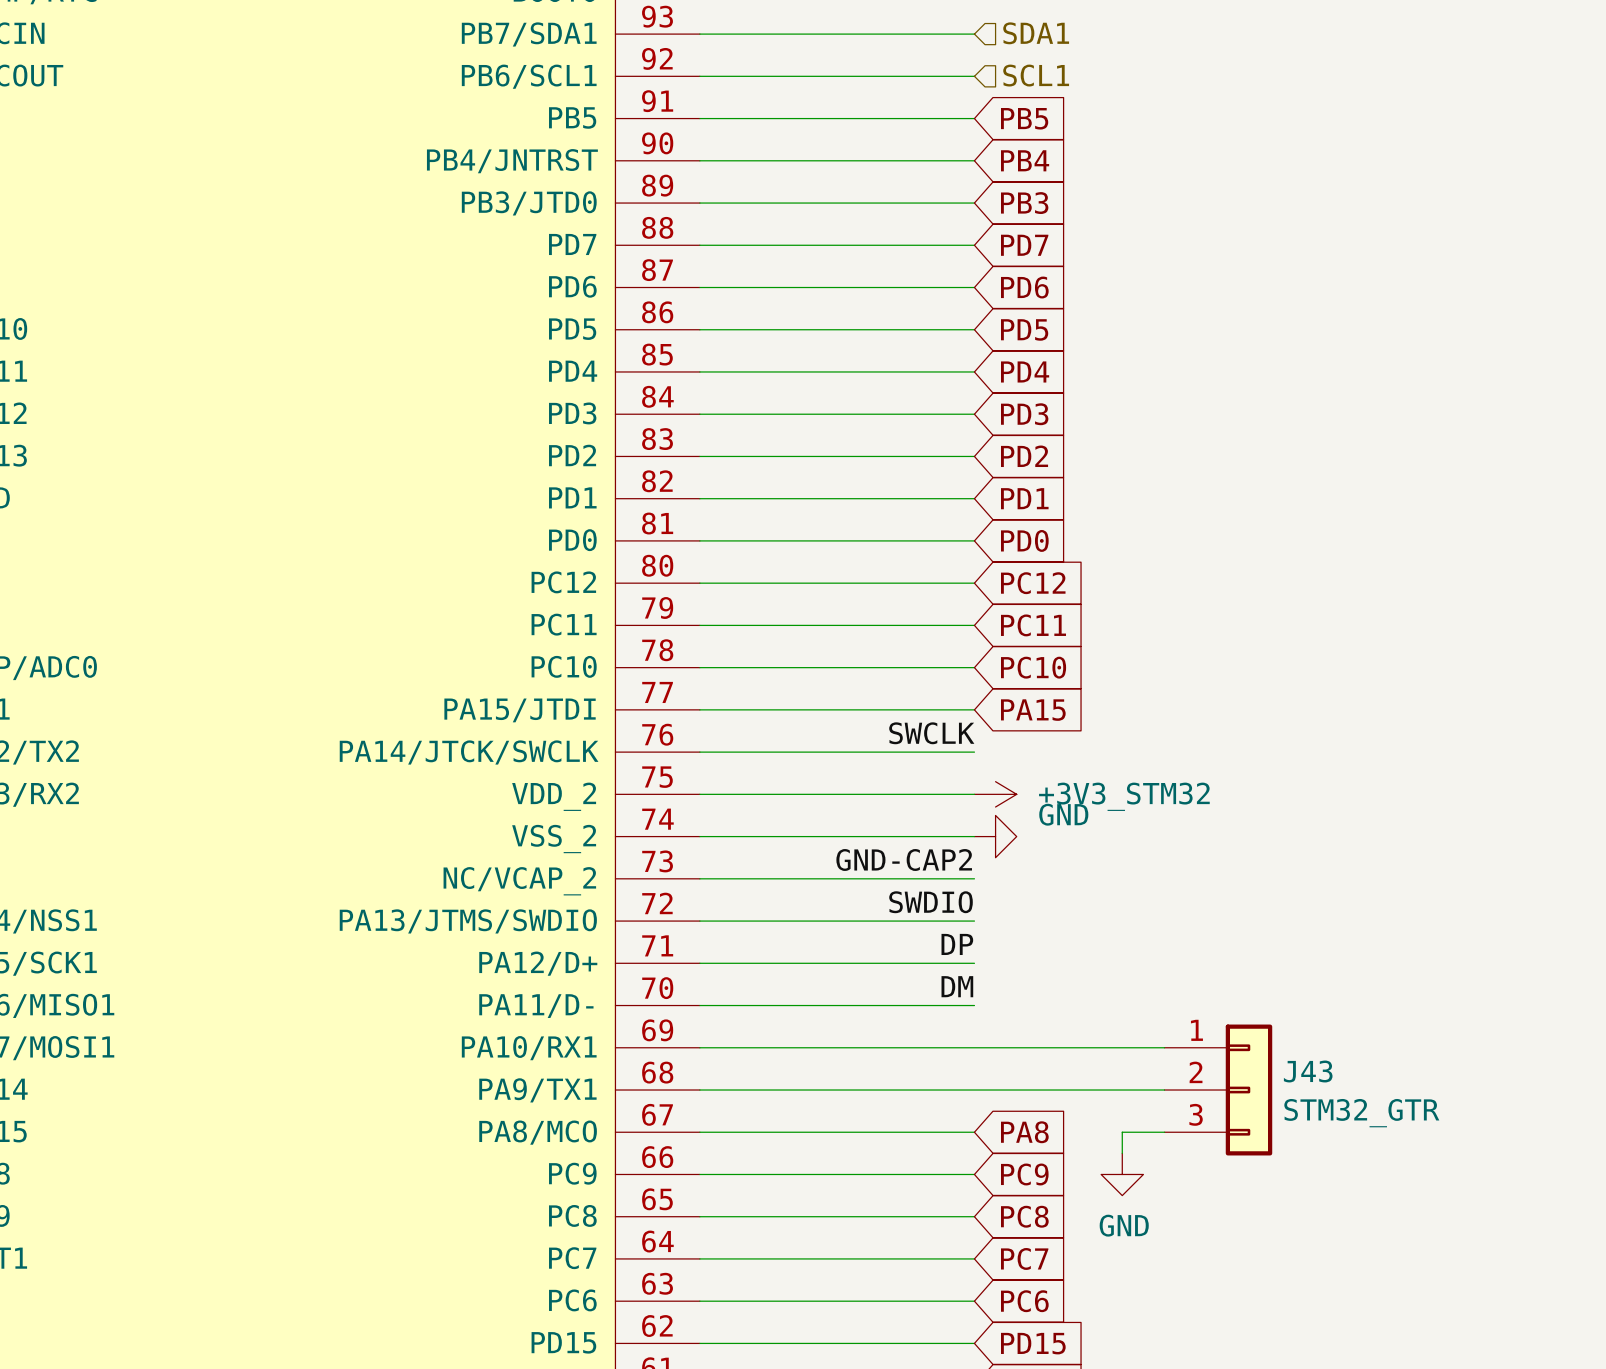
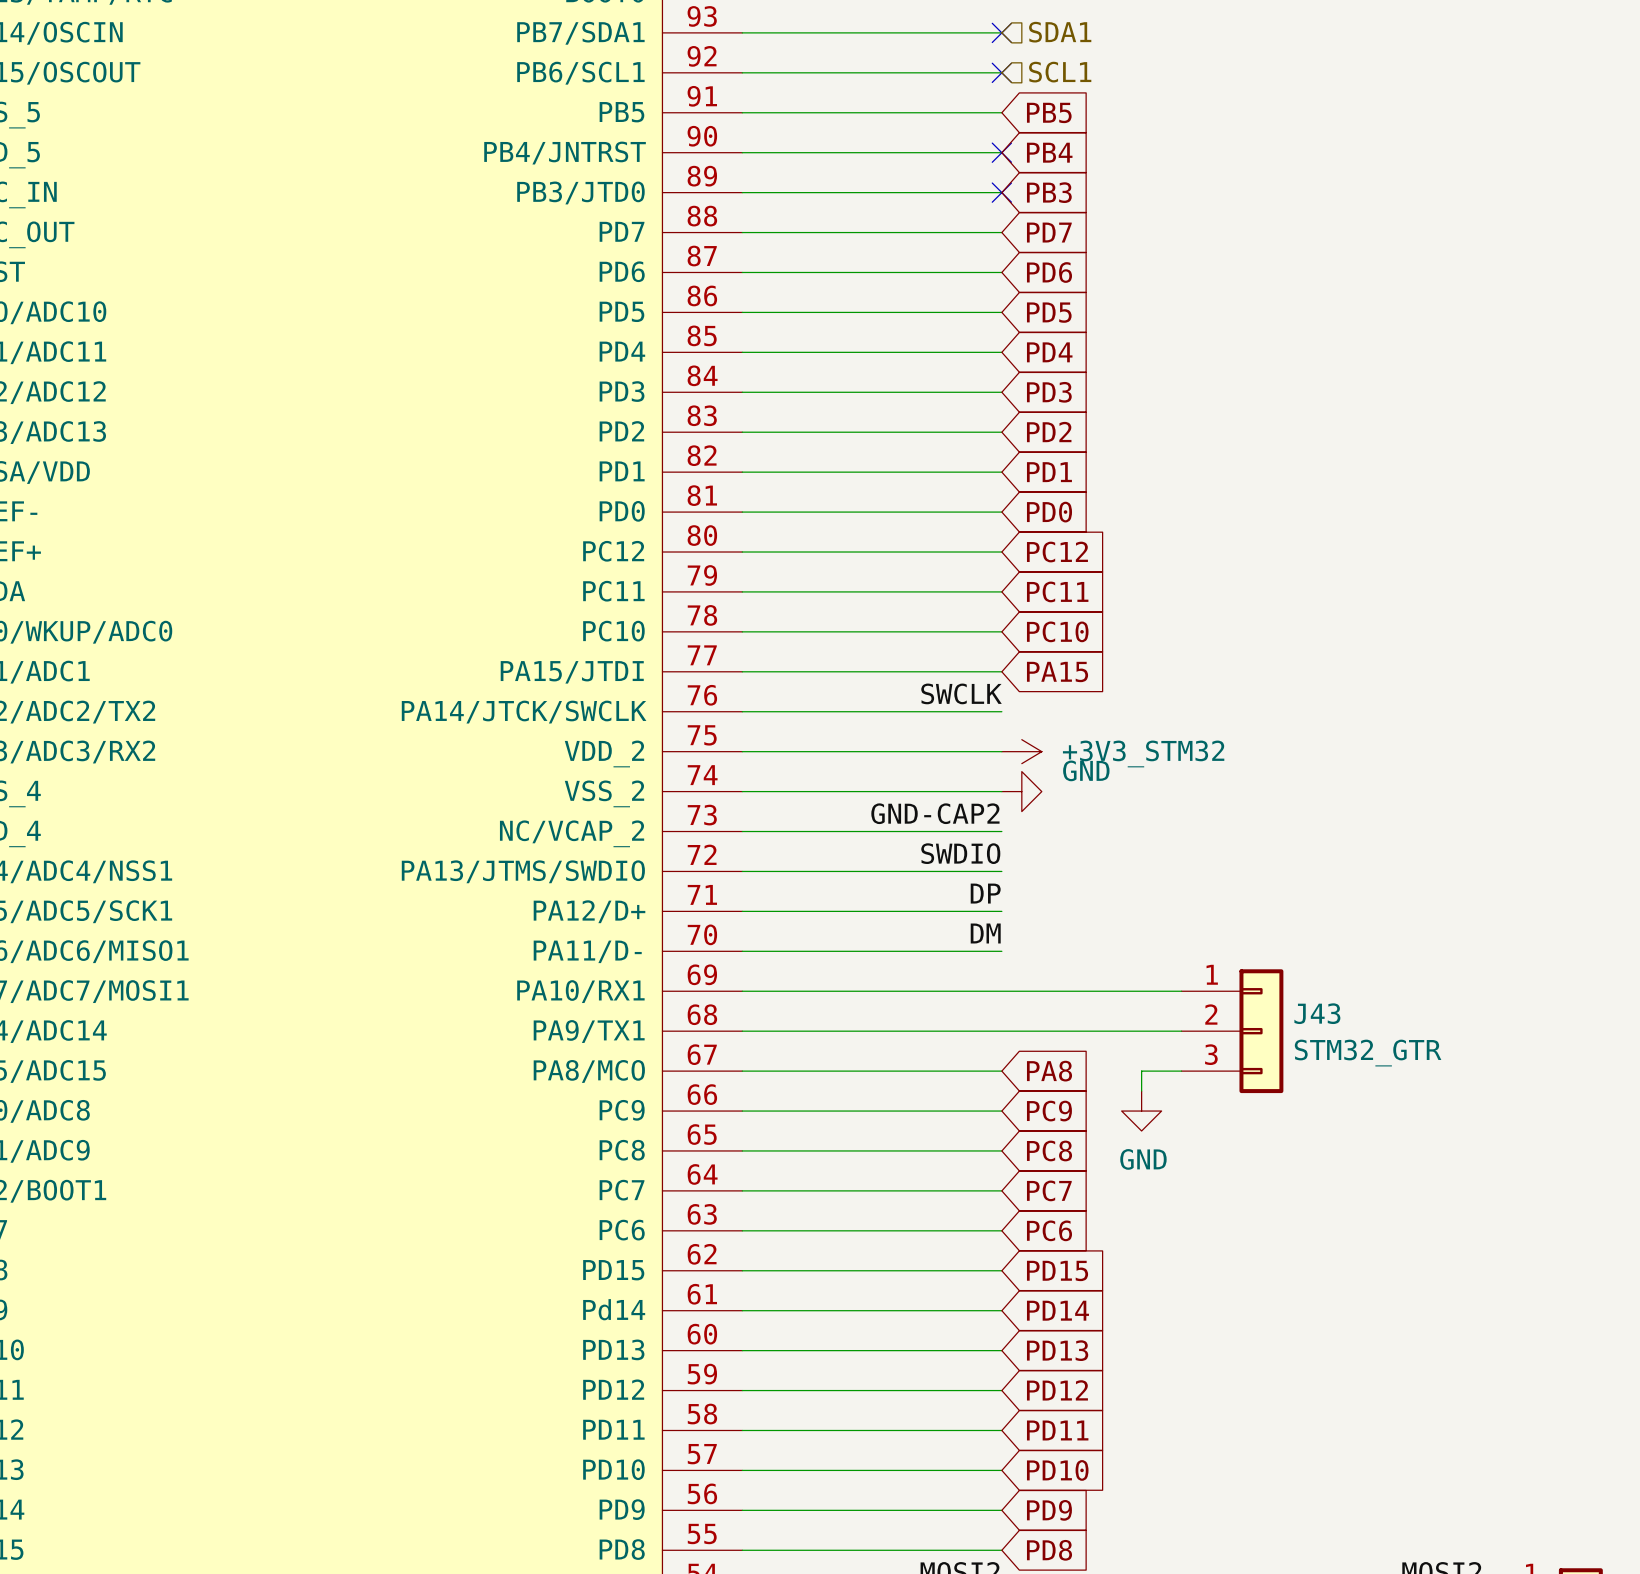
no-connect mark: none -> (1001, 32)
no-connect mark: none -> (1001, 72)
no-connect mark: none -> (1001, 152)
no-connect mark: none -> (1001, 192)

